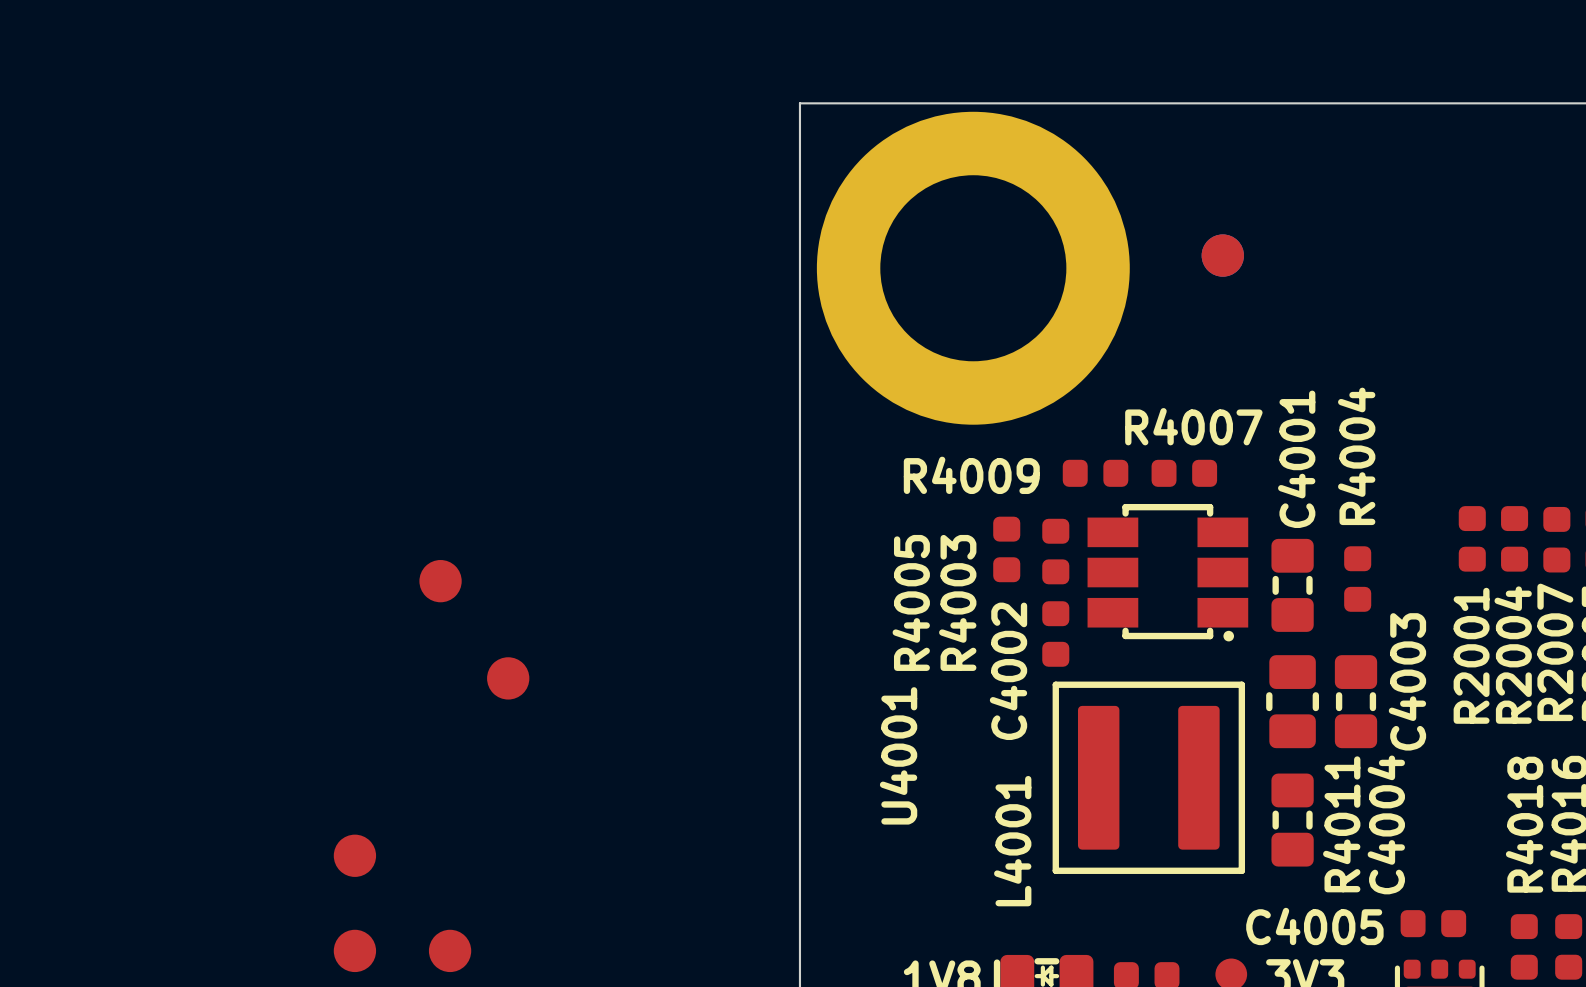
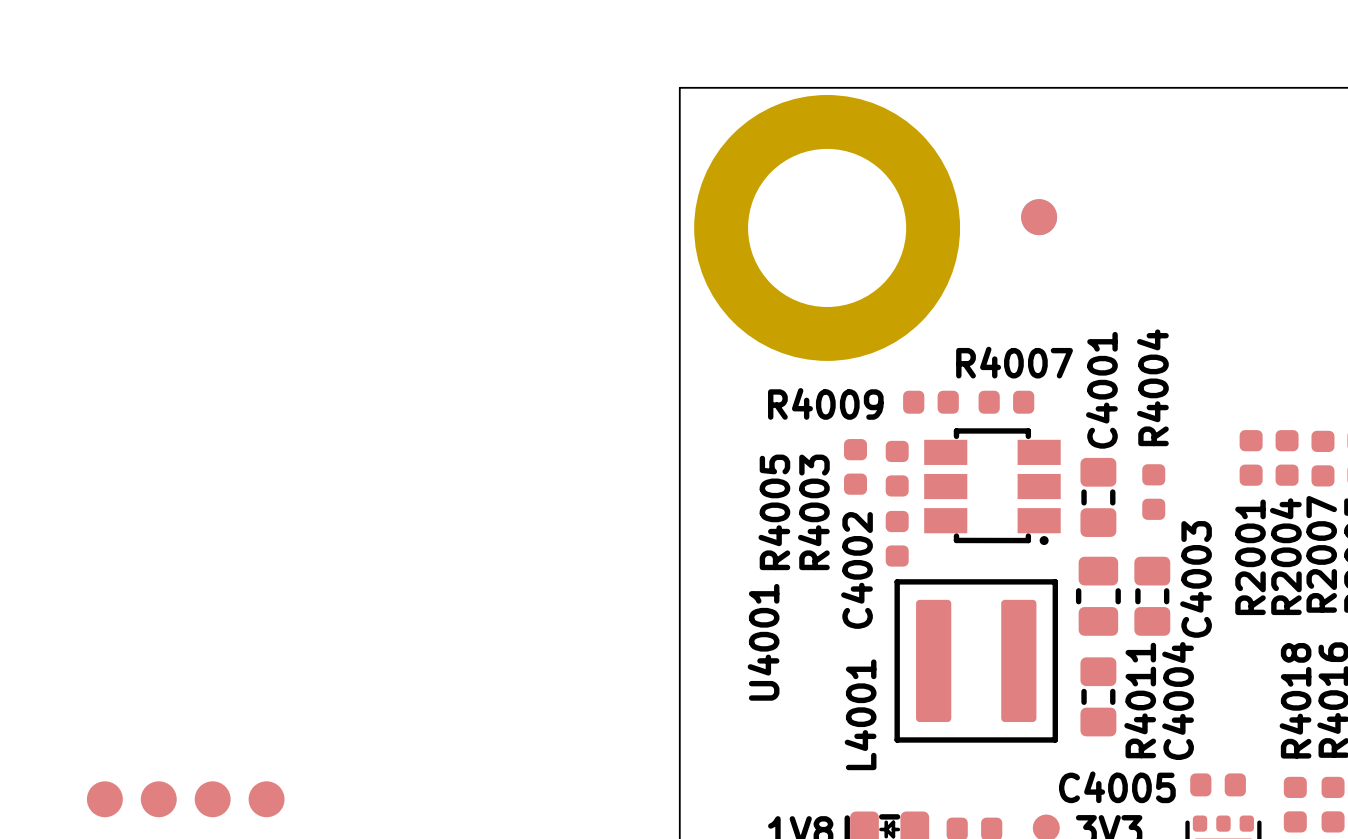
part: (440, 581) -> none
part: (508, 678) -> none
part: (354, 855) -> none
part: none -> (104, 799)
part: none -> (158, 799)
part: none -> (212, 799)
part position: (354, 950) -> (266, 799)
part: (450, 950) -> none

